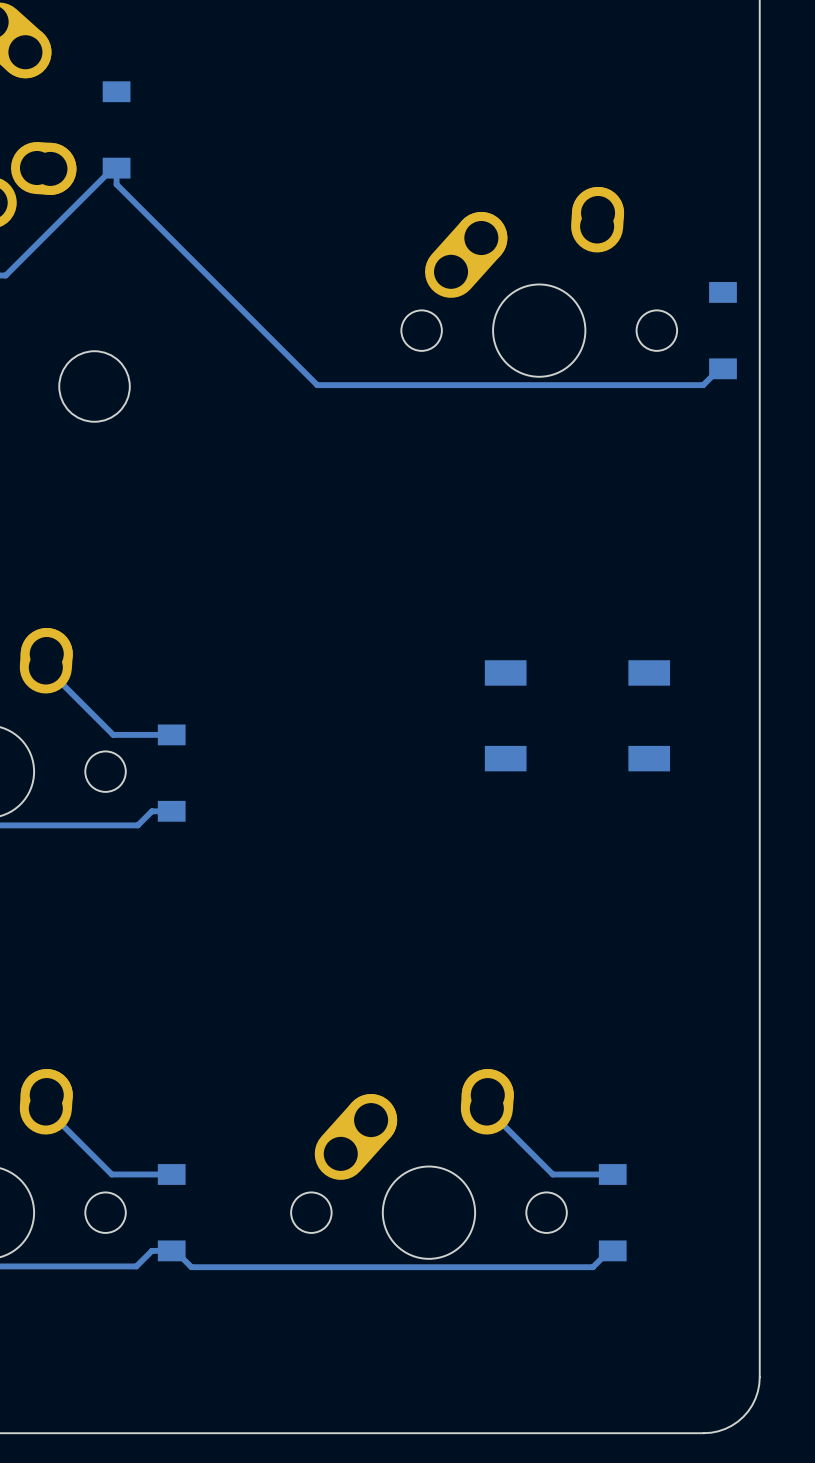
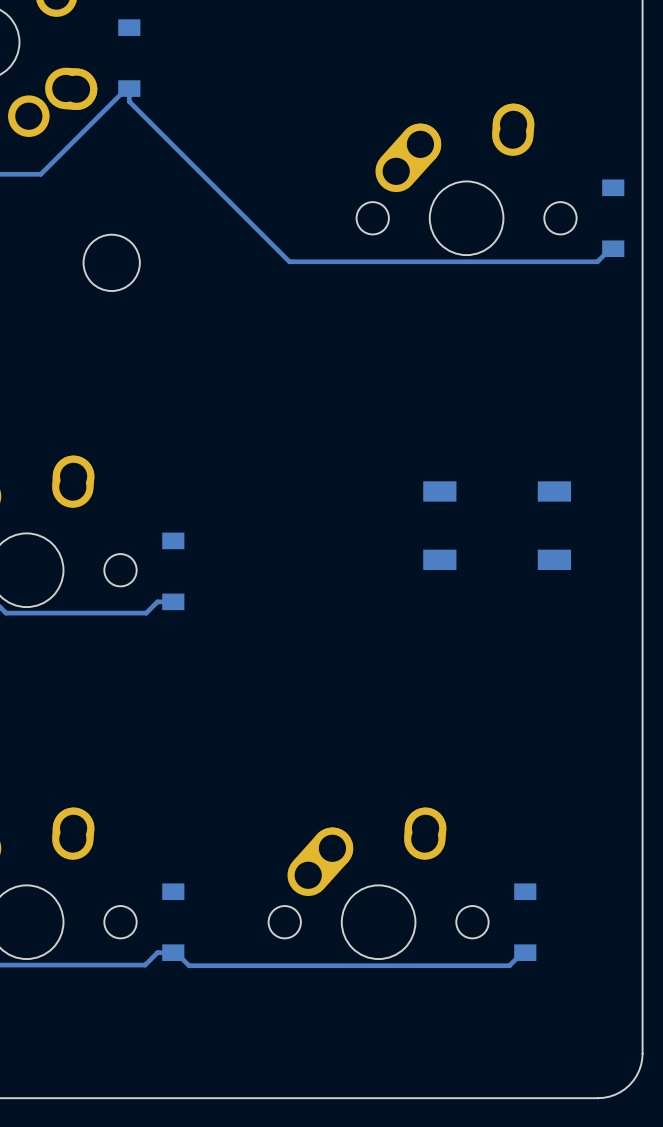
bottom track: (45, 667) (113, 734) (171, 734) -> none
bottom track: (45, 1108) (111, 1174) (171, 1174) -> none
bottom track: (486, 1108) (552, 1174) (612, 1174) -> none

